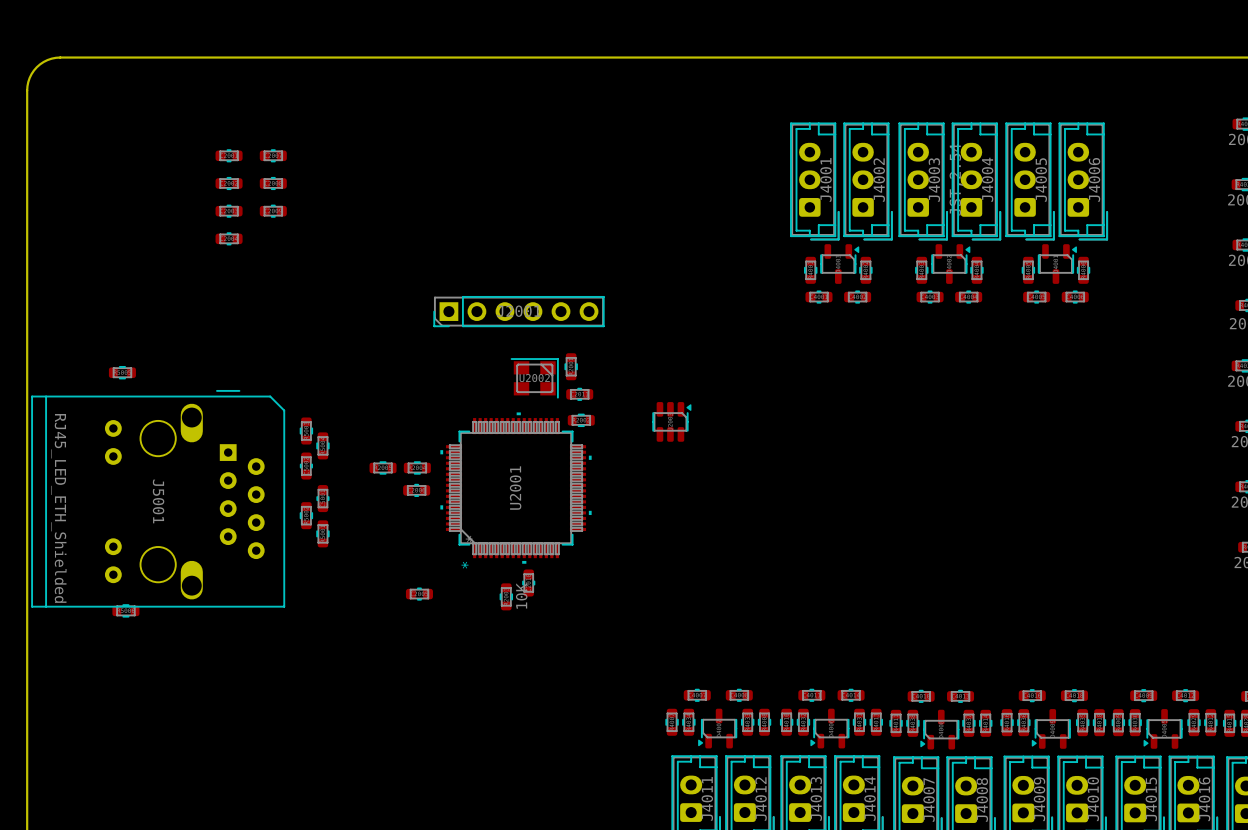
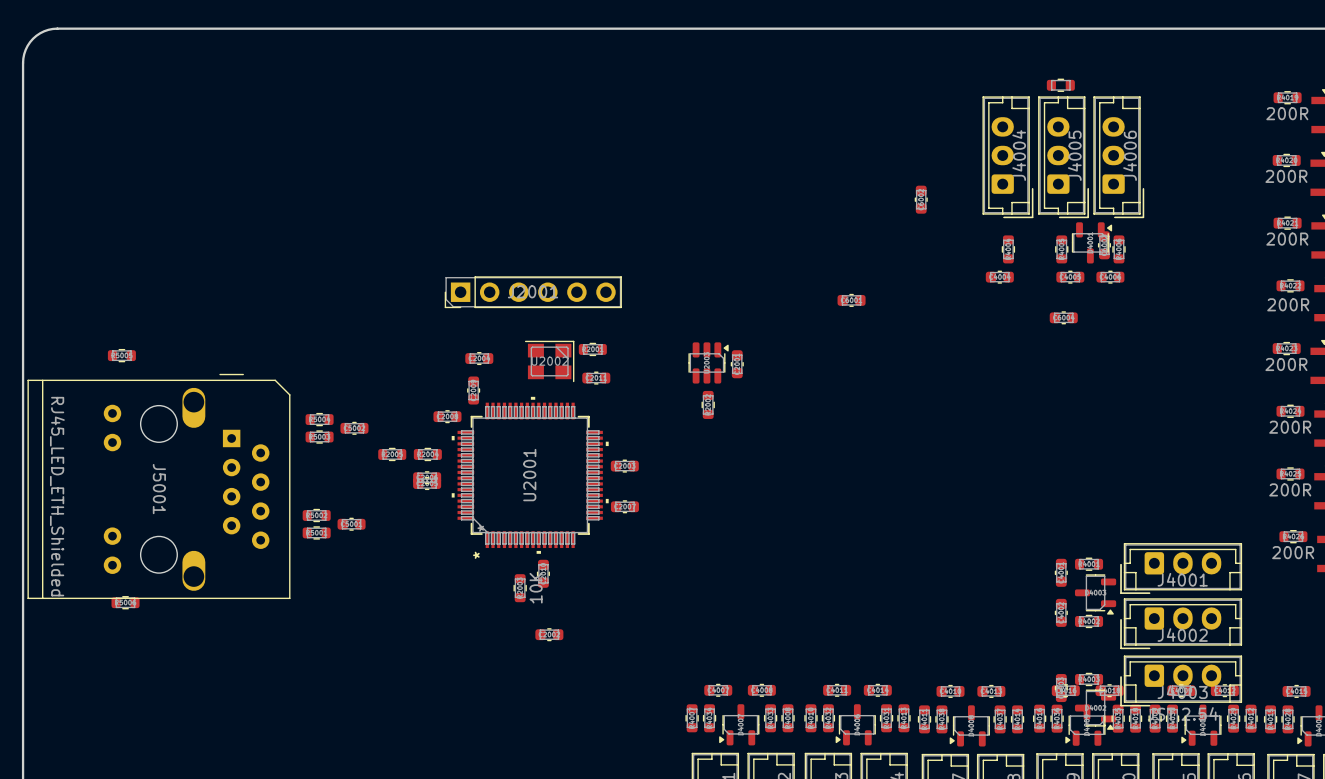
part: none -> (1060, 85)
part rotation: 0° (229, 155) -> 90° clockwise (737, 364)
part position: (229, 155) -> (737, 364)
part position: (273, 155) -> (624, 506)
J4001 rotation: 0° (814, 181) -> 90° clockwise (1181, 568)
J4001 position: (814, 181) -> (1181, 568)
J4002 rotation: 0° (868, 181) -> 90° clockwise (1181, 623)
J4002 position: (868, 181) -> (1181, 623)
J4003 rotation: 0° (923, 181) -> 90° clockwise (1181, 680)
J4003 position: (923, 181) -> (1181, 680)
part position: (229, 183) -> (549, 634)
part position: (273, 183) -> (447, 416)
part position: (229, 211) -> (624, 466)
part rotation: 0° (273, 211) -> 90° clockwise (473, 390)
part position: (273, 211) -> (473, 390)
part: none -> (921, 199)
part position: (229, 238) -> (479, 358)
part rotation: 0° (839, 264) -> 90° clockwise (1095, 594)
part position: (839, 264) -> (1095, 594)
part rotation: 0° (950, 264) -> 90° clockwise (1095, 709)
part position: (950, 264) -> (1095, 709)
part: none -> (1104, 245)
part rotation: 0° (810, 270) -> 90° clockwise (1089, 564)
part position: (810, 270) -> (1089, 564)
part rotation: 0° (865, 270) -> 90° clockwise (1089, 621)
part position: (865, 270) -> (1089, 621)
part rotation: 0° (921, 270) -> 90° clockwise (1089, 679)
part position: (921, 270) -> (1089, 679)
part rotation: 0° (819, 297) -> 90° clockwise (1061, 572)
part position: (819, 297) -> (1061, 572)
part rotation: 0° (857, 297) -> 90° clockwise (1061, 612)
part position: (857, 297) -> (1061, 612)
part rotation: 0° (930, 297) -> 90° clockwise (1061, 688)
part position: (930, 297) -> (1061, 688)
part: none -> (851, 300)
part: none -> (1063, 317)
part rotation: 0° (571, 366) -> 90° clockwise (592, 349)
part rotation: 0° (581, 420) -> 90° clockwise (708, 404)
part position: (581, 420) -> (708, 404)
part position: (671, 421) -> (708, 362)
part rotation: 0° (306, 431) -> 90° clockwise (319, 437)
part position: (306, 431) -> (319, 437)
part rotation: 0° (322, 445) -> 90° clockwise (319, 419)
part rotation: 0° (306, 466) -> 90° clockwise (354, 428)
part position: (306, 466) -> (354, 428)
part rotation: 0° (322, 498) -> 90° clockwise (351, 524)
part position: (322, 498) -> (351, 524)
part rotation: 0° (306, 515) -> 90° clockwise (316, 515)
part rotation: 0° (322, 533) -> 90° clockwise (316, 532)
part position: (419, 594) -> (427, 483)

